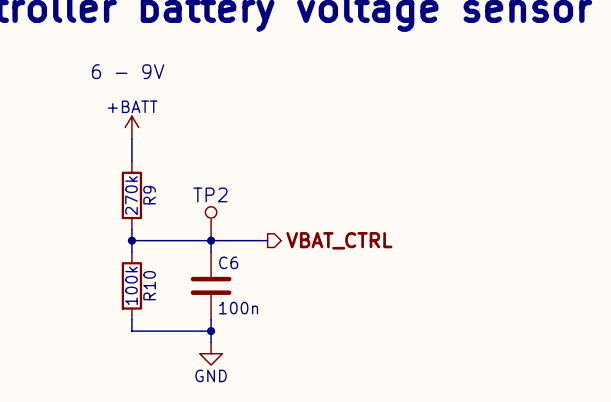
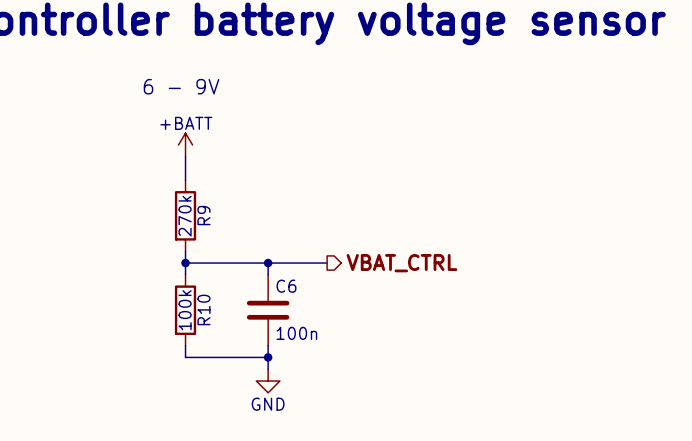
TP2: (211, 223) -> none

